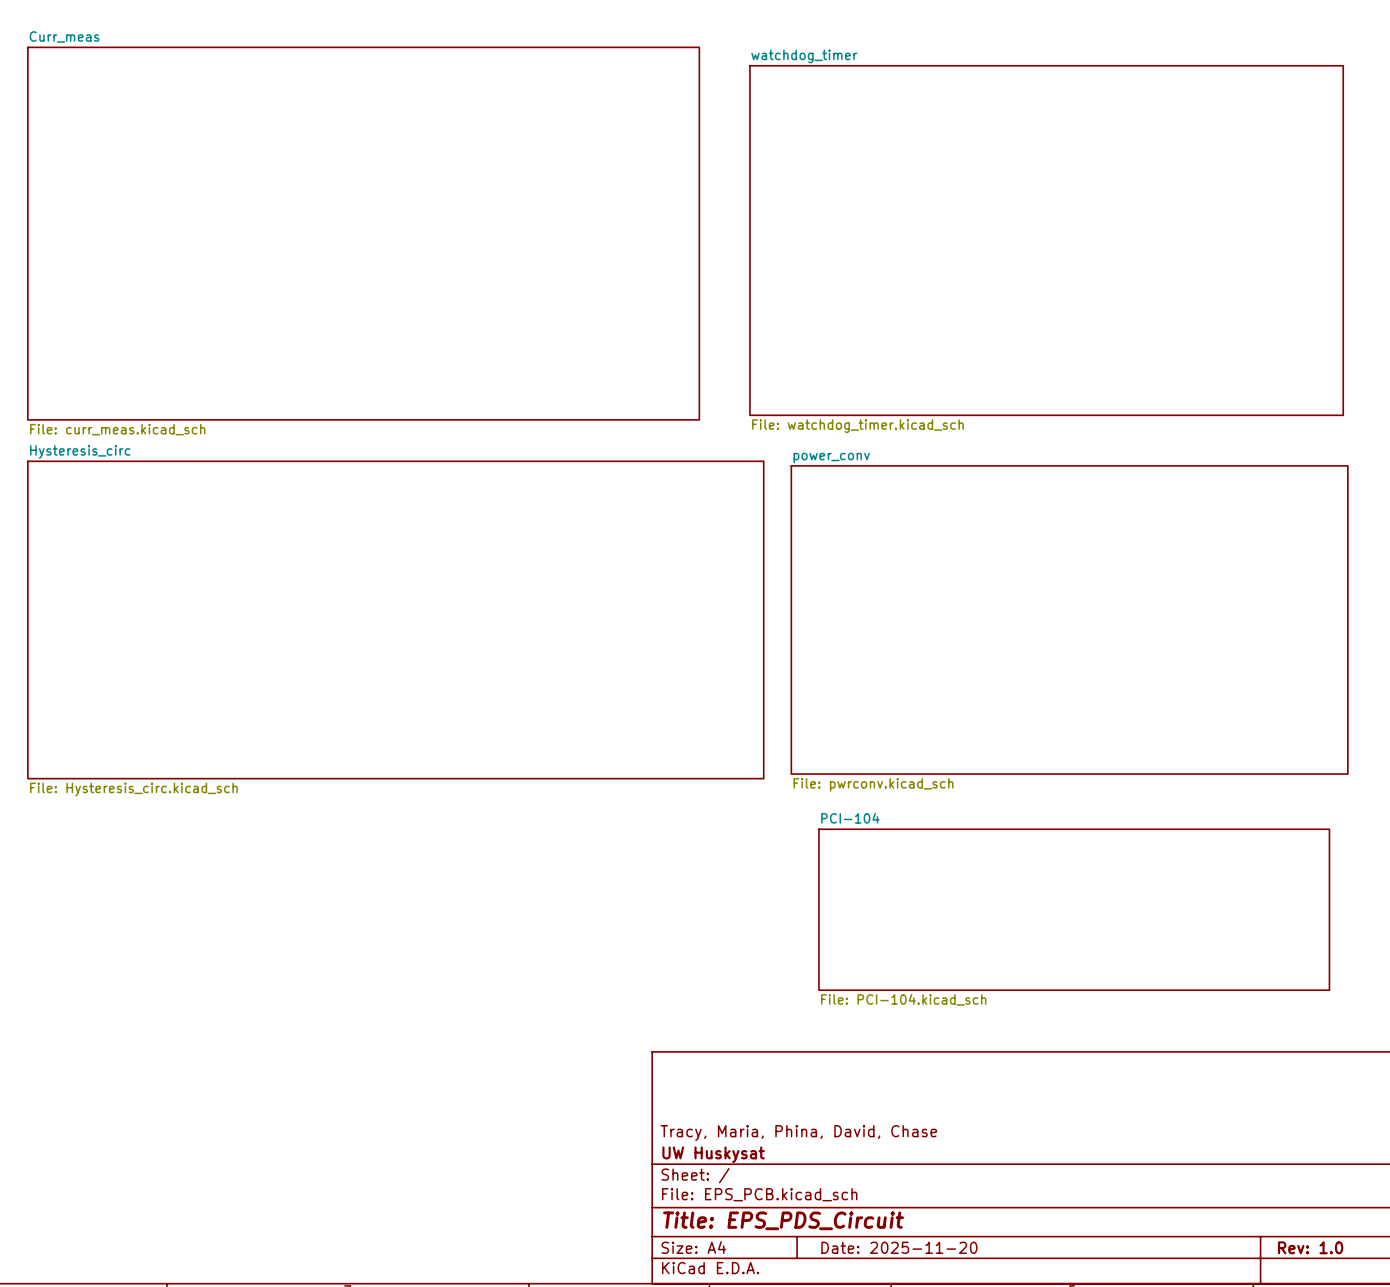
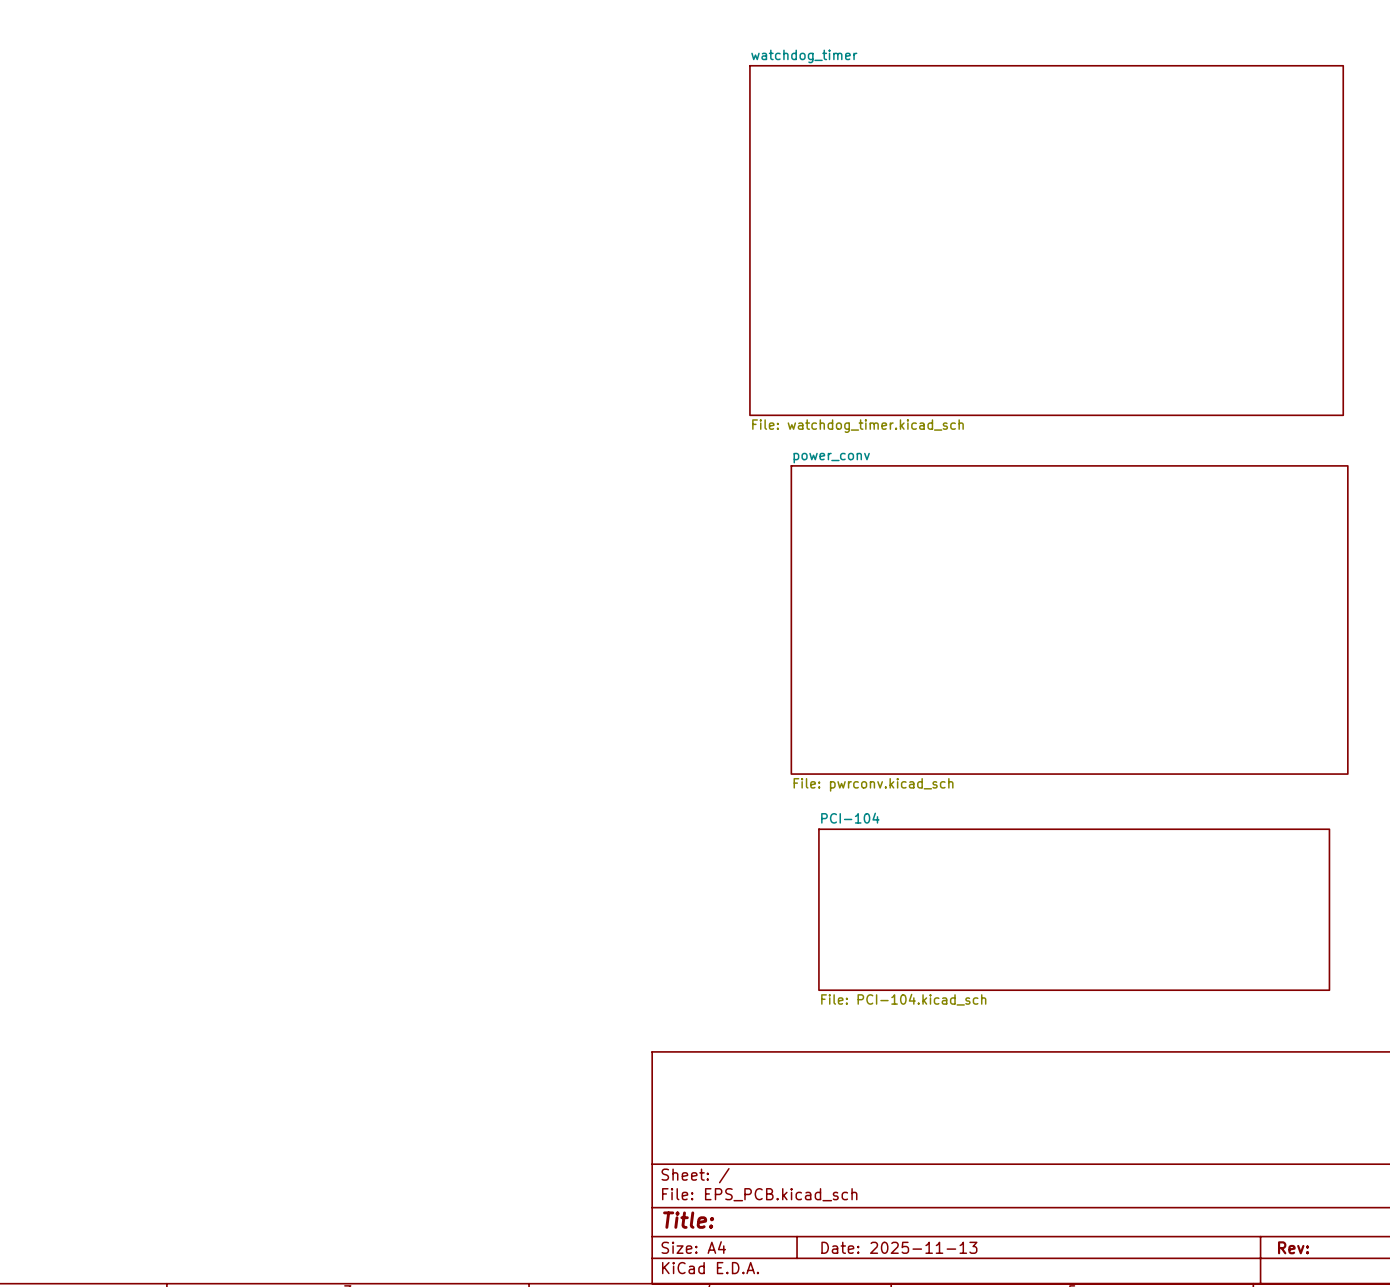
sheet Curr_meas: File: curr_meas.kicad_sch (363, 233) -> none
sheet Hysteresis_circ: File: Hysteresis_circ.kicad_sch (395, 619) -> none
title block: Tracy, Maria, Phina, David, Chase (798, 1133) -> none
title block: UW Huskysat (713, 1154) -> none
title block: Title: EPS_PDS_Circuit (783, 1220) -> Title: (688, 1220)
title block: Date: 2025-11-20 (899, 1247) -> Date: 2025-11-13 (899, 1247)
title block: Rev: 1.0 (1310, 1247) -> Rev: (1293, 1247)

